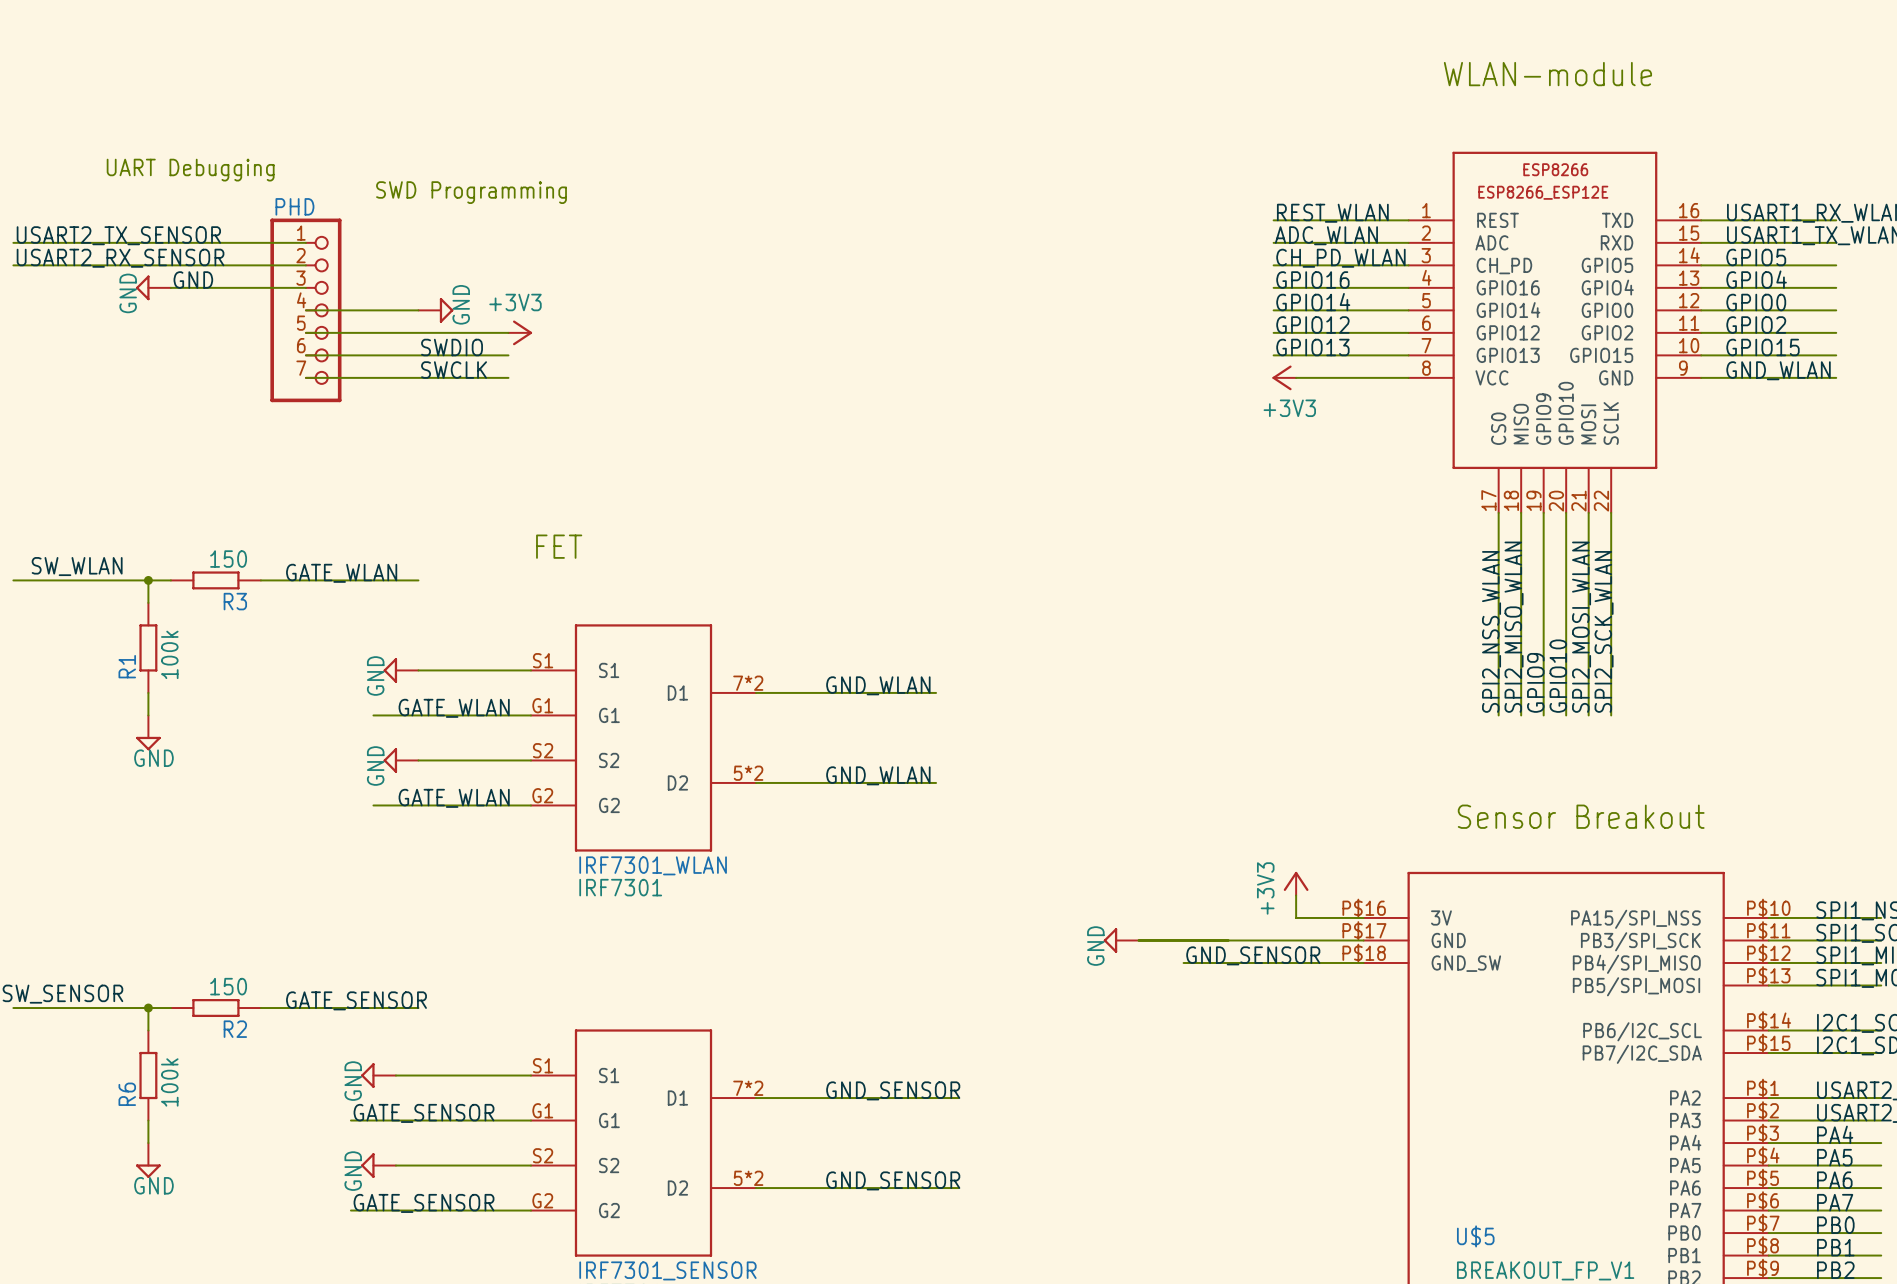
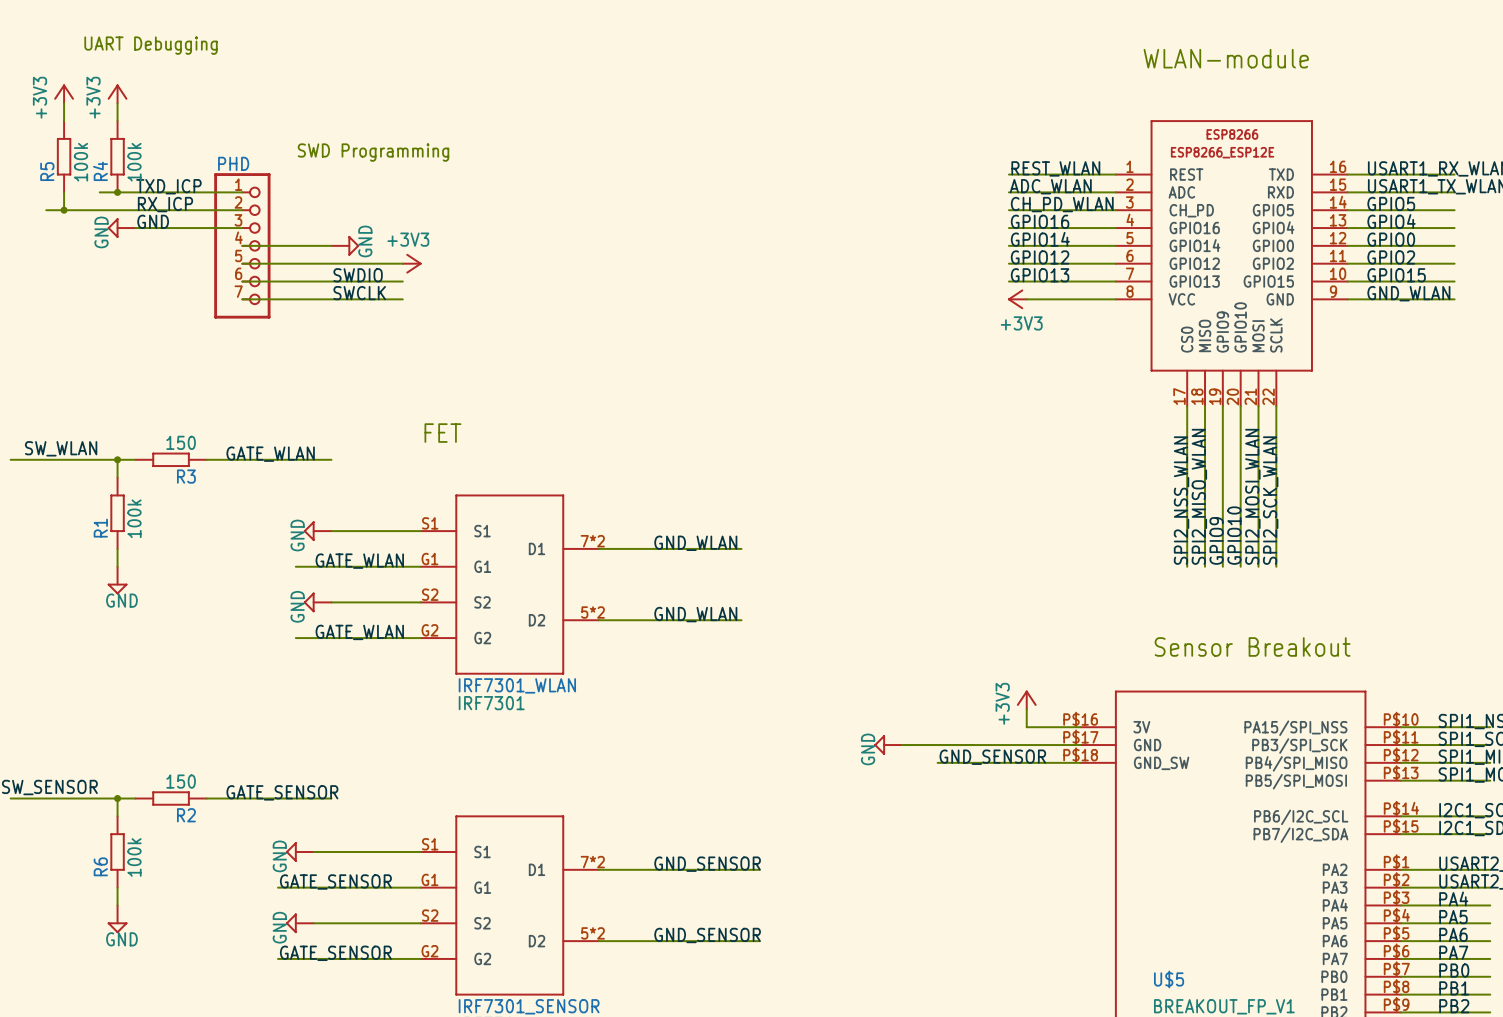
power symbol: none -> +3V3 (64, 93)
power symbol: none -> +3V3 (117, 93)
wire: none -> (64, 103) (64, 121)
wire: none -> (117, 103) (117, 121)
text position: UART Debugging (190, 170) -> UART Debugging (151, 45)
R5: none -> 100k (64, 156)
R4: none -> 100k (117, 156)
label: USART2_TX_SENSOR (118, 235) -> none
label: none -> TXD_ICP (168, 186)
wire: (13, 242) (125, 242) -> none
wire: none -> (64, 192) (64, 210)
junction: none -> (117, 192)
label: USART2_RX_SENSOR (120, 258) -> none
label: none -> RX_ICP (165, 204)
wire: (13, 265) (58, 265) -> none
junction: none -> (64, 210)

